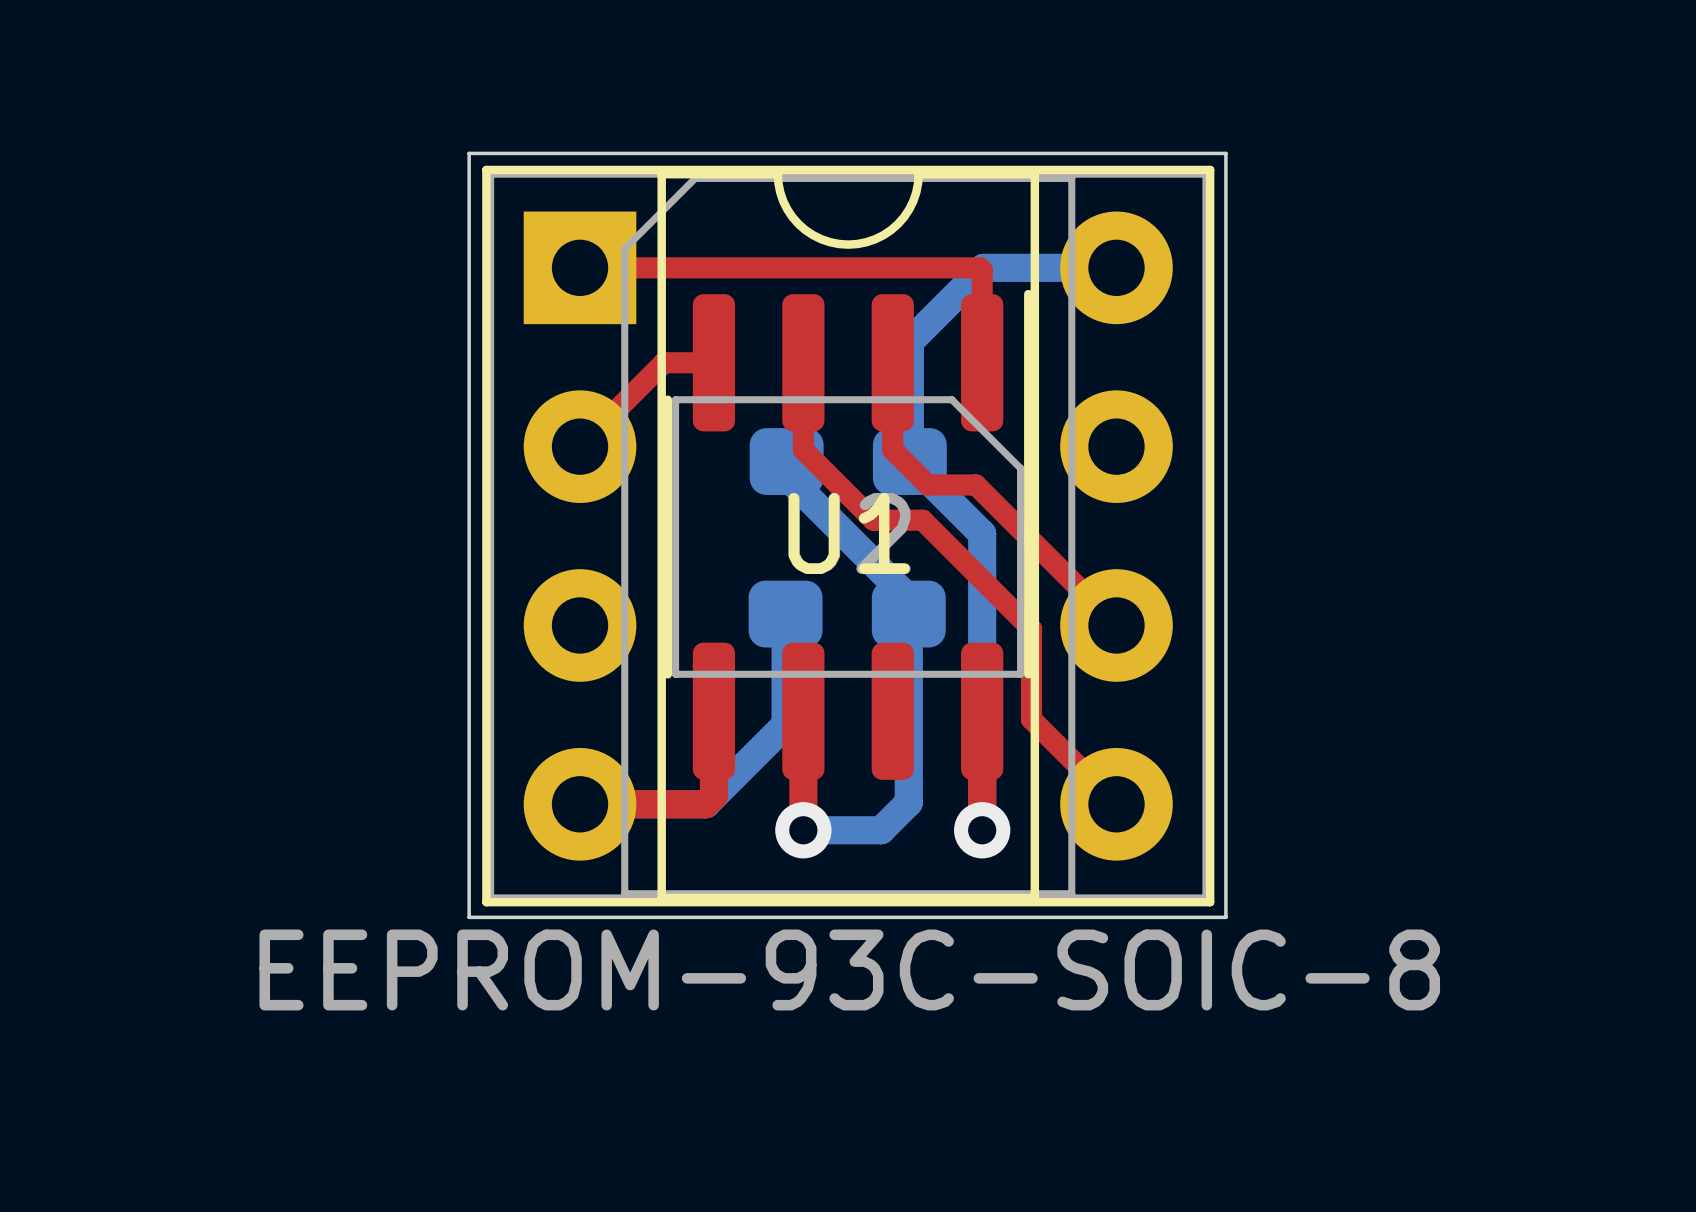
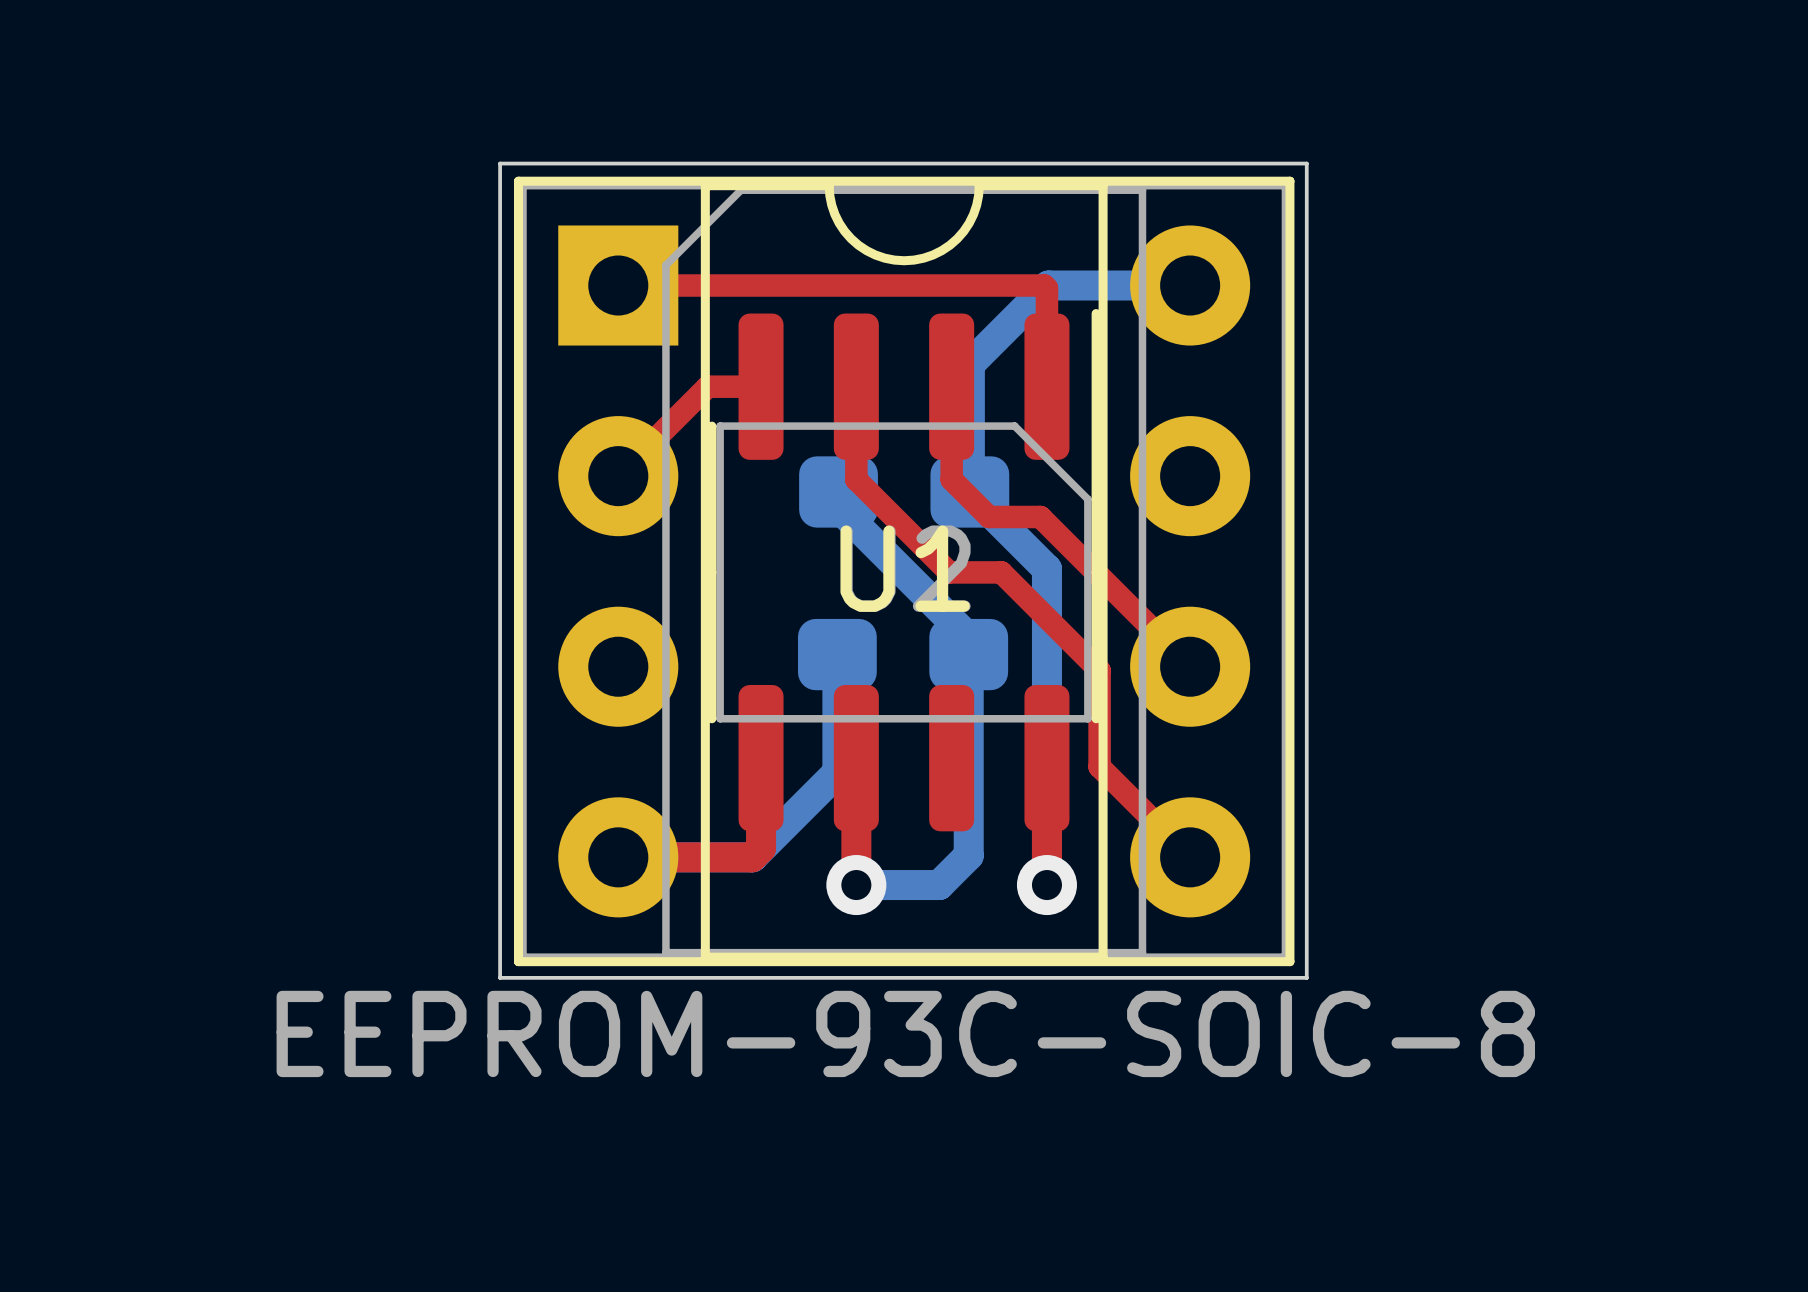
top track: (873, 520) (922, 520) (939, 537) -> (931, 554) (949, 572) (1001, 572)

